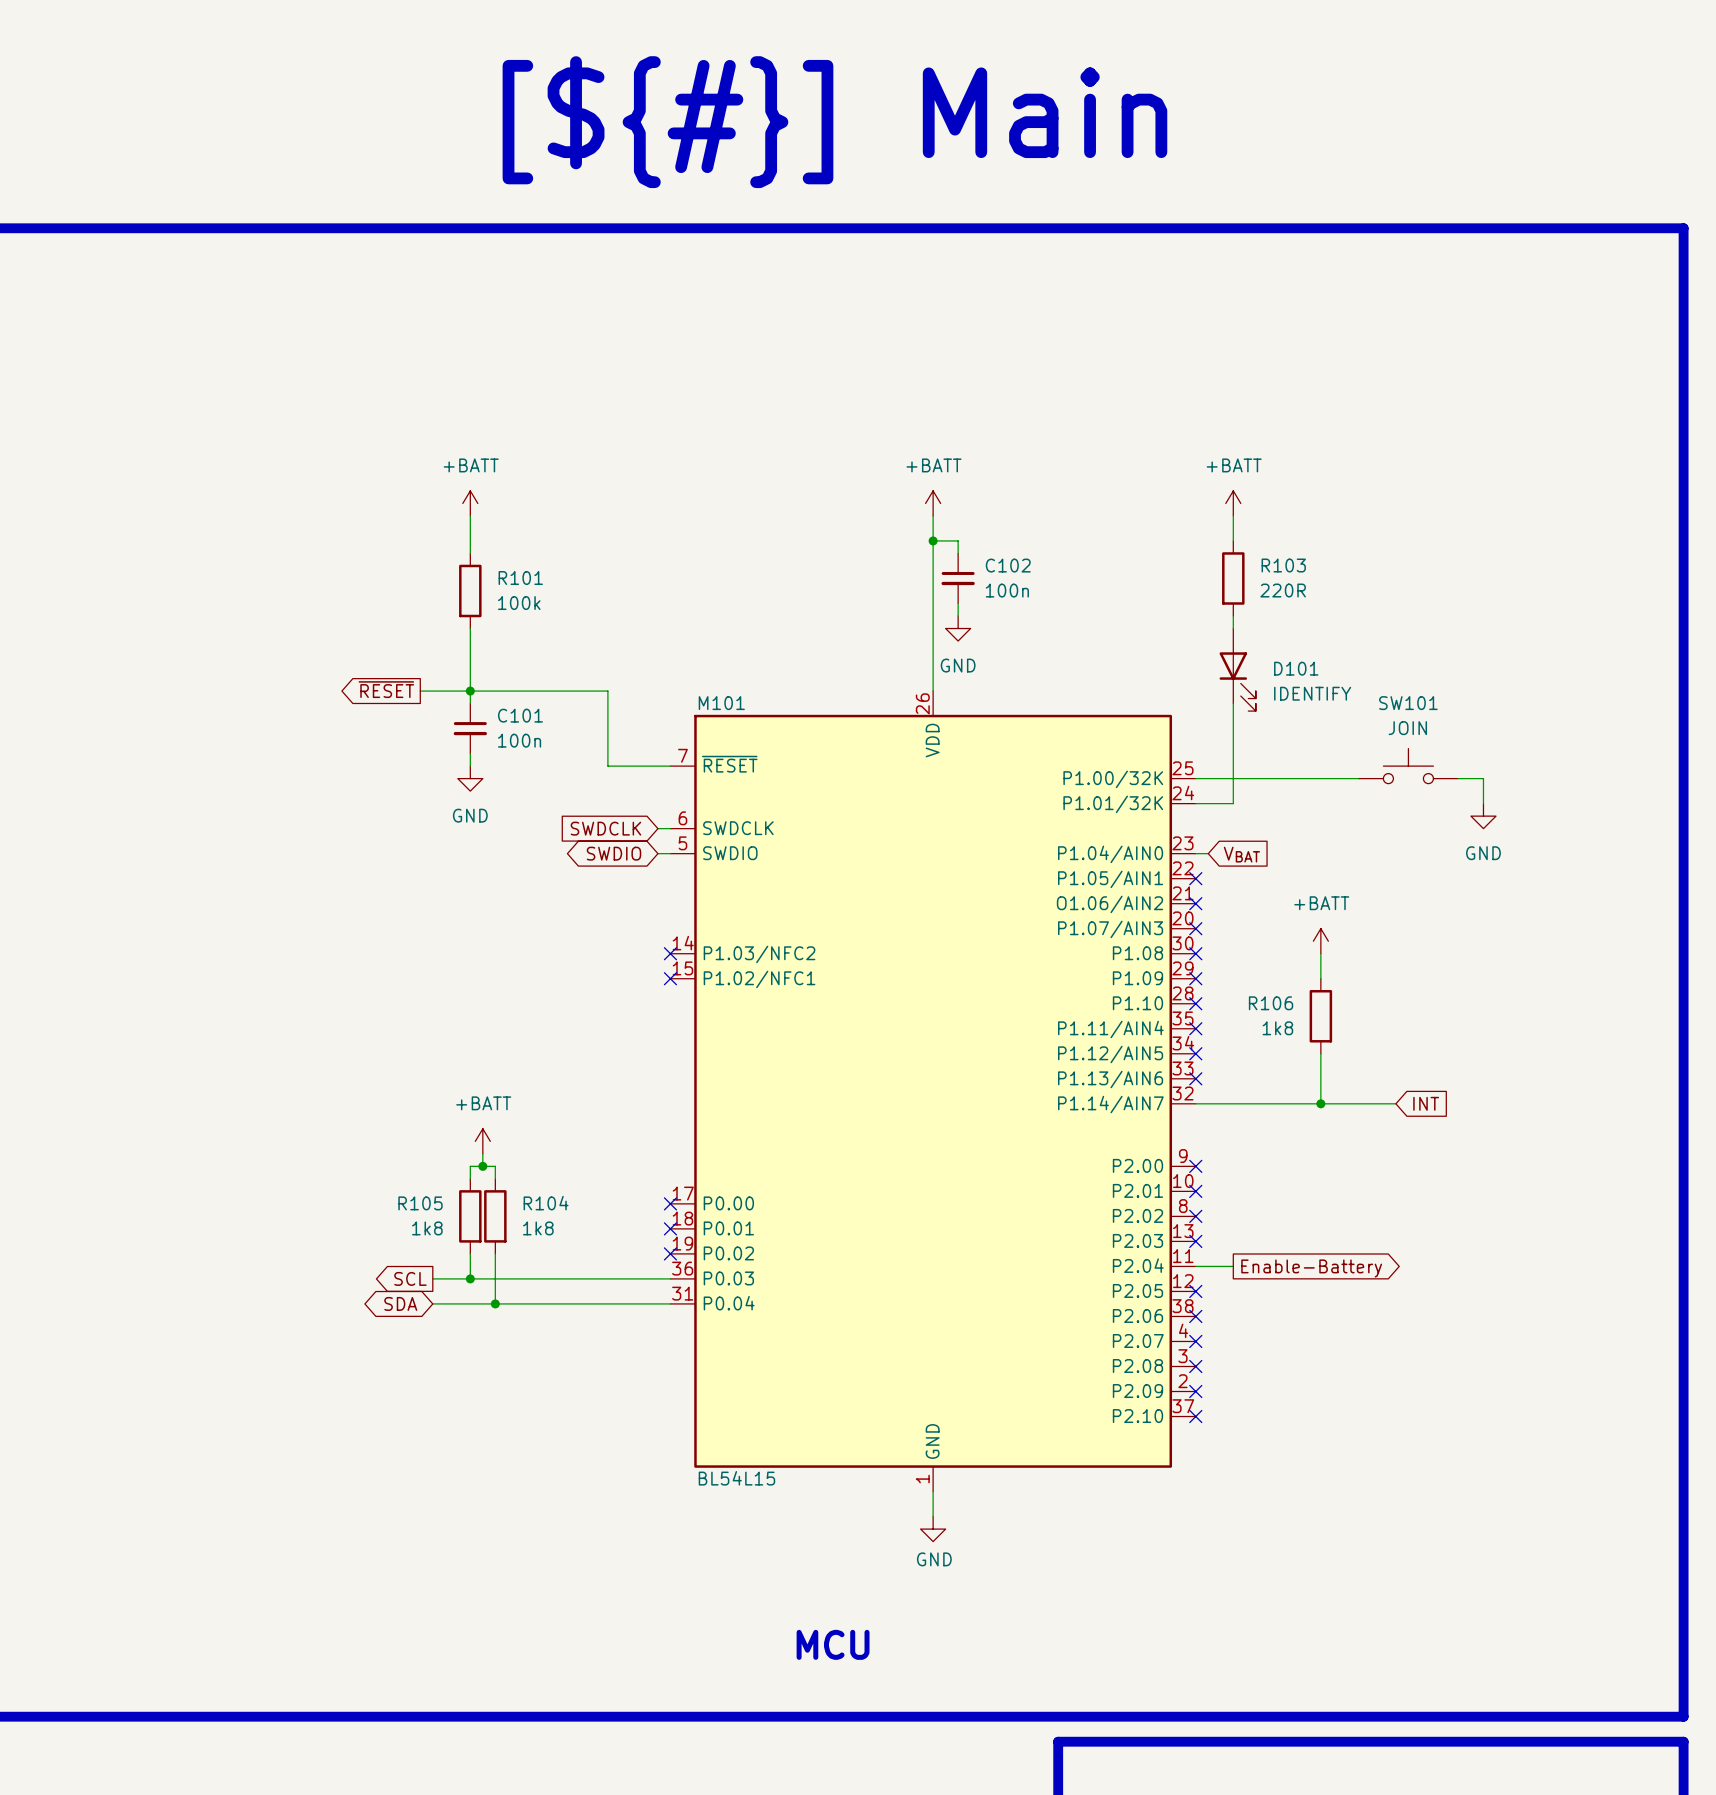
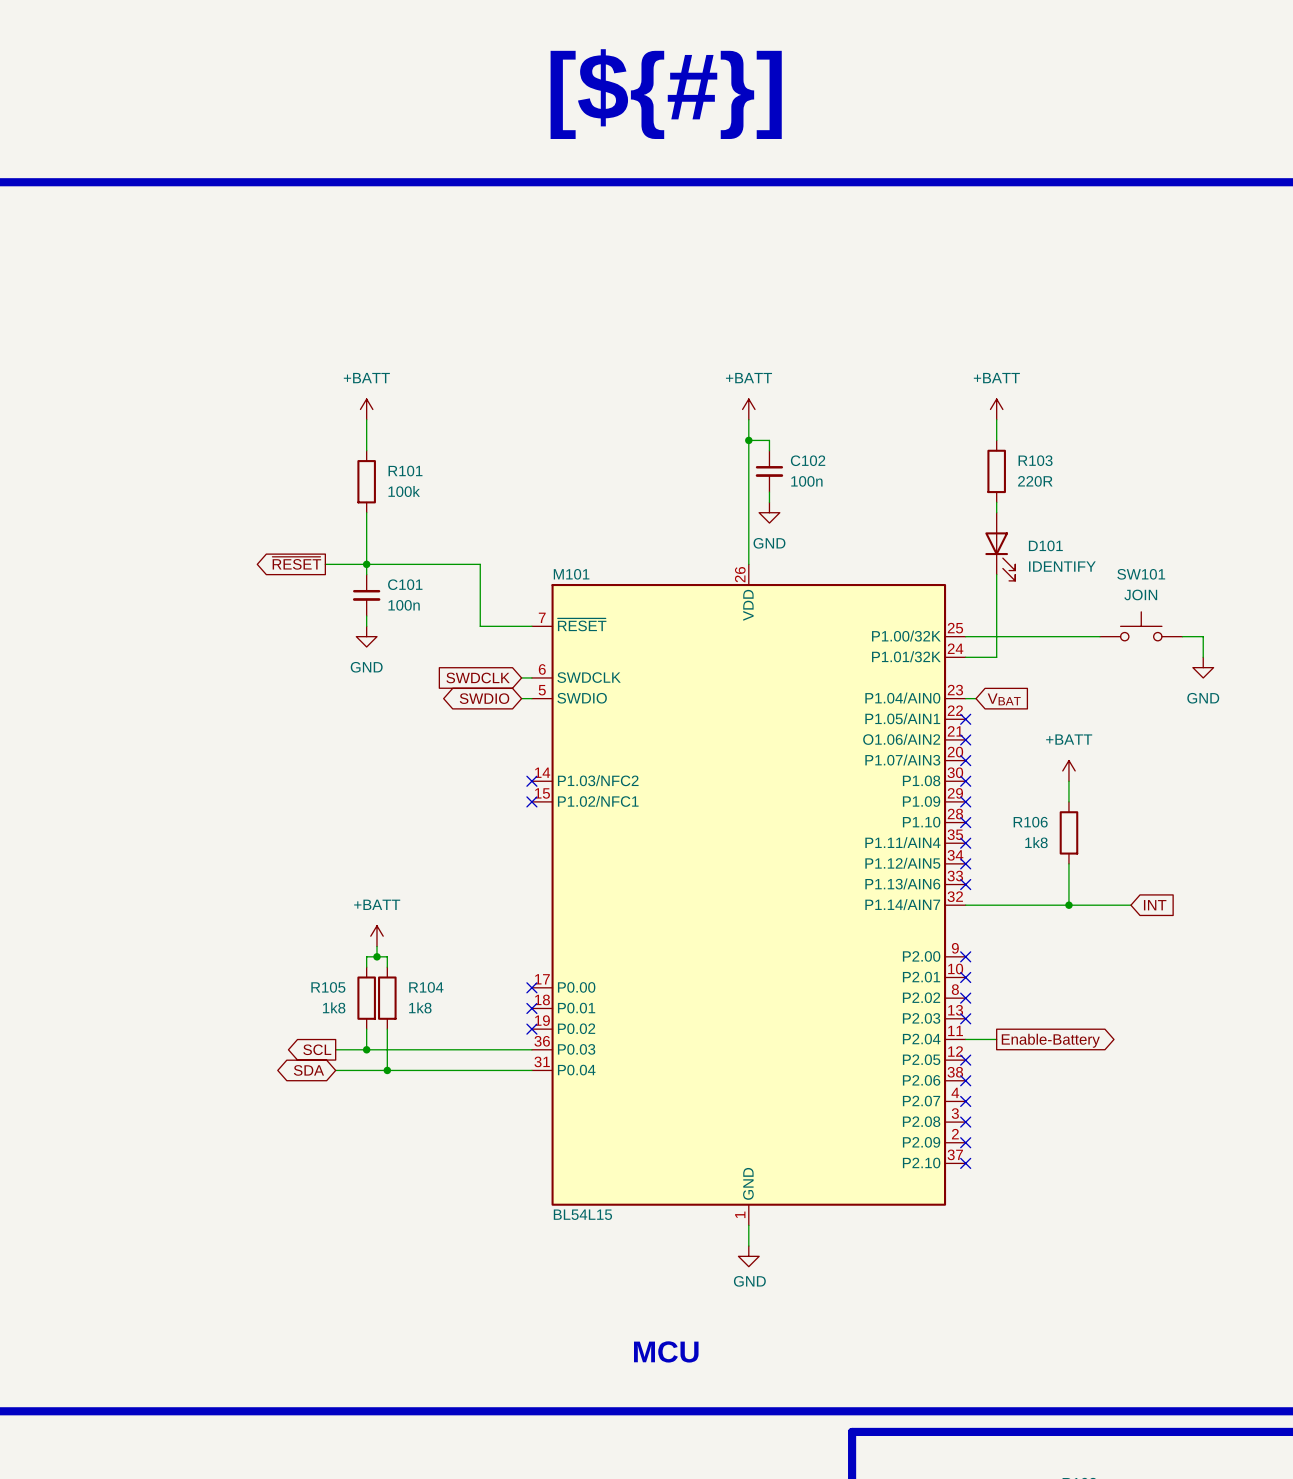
text: [${#}] Main (834, 122) -> [${#}] (666, 94)

